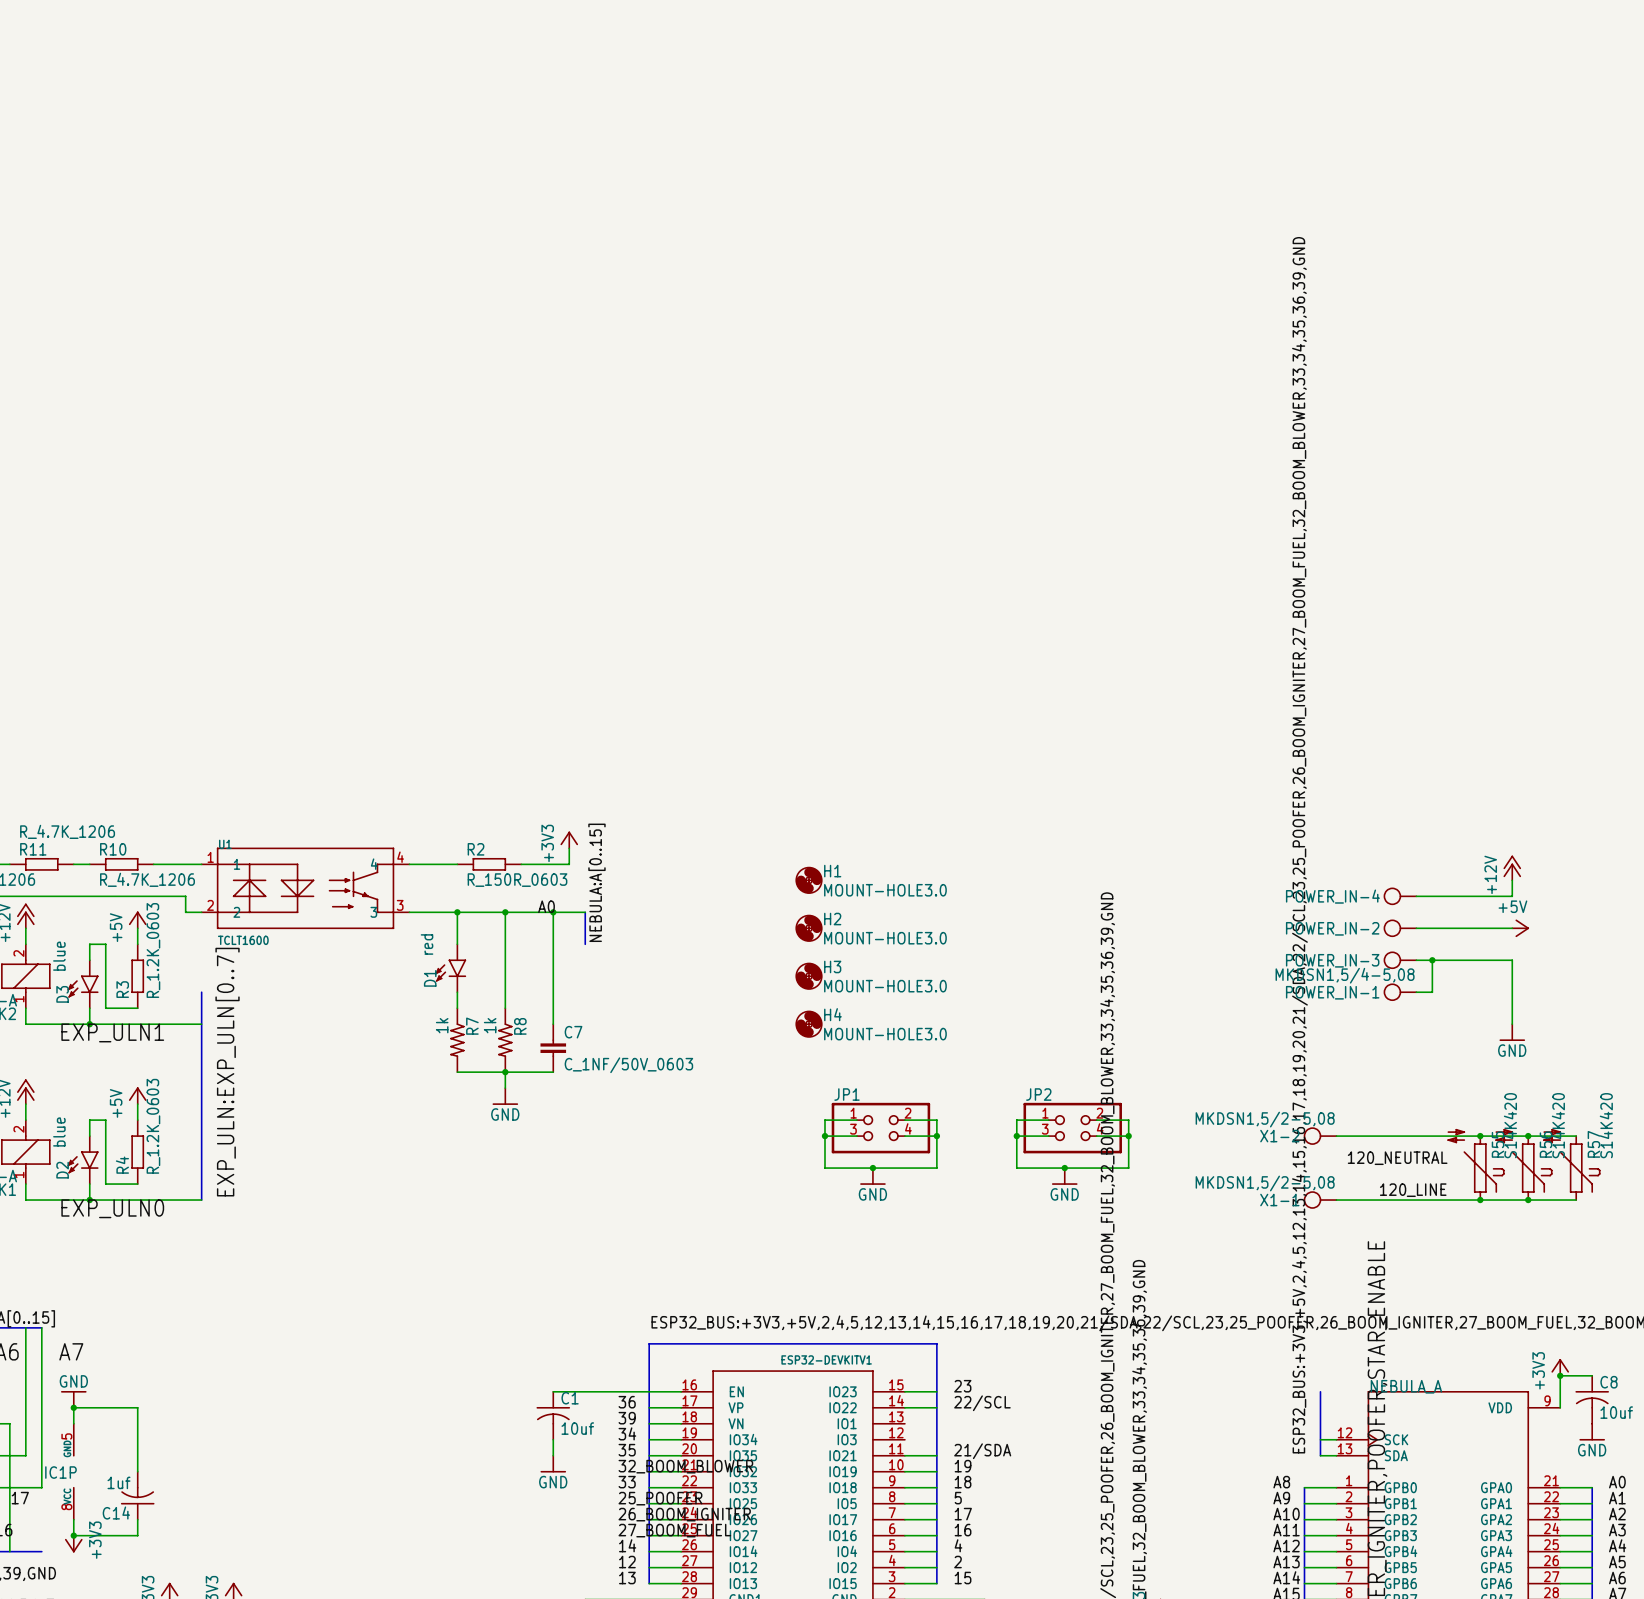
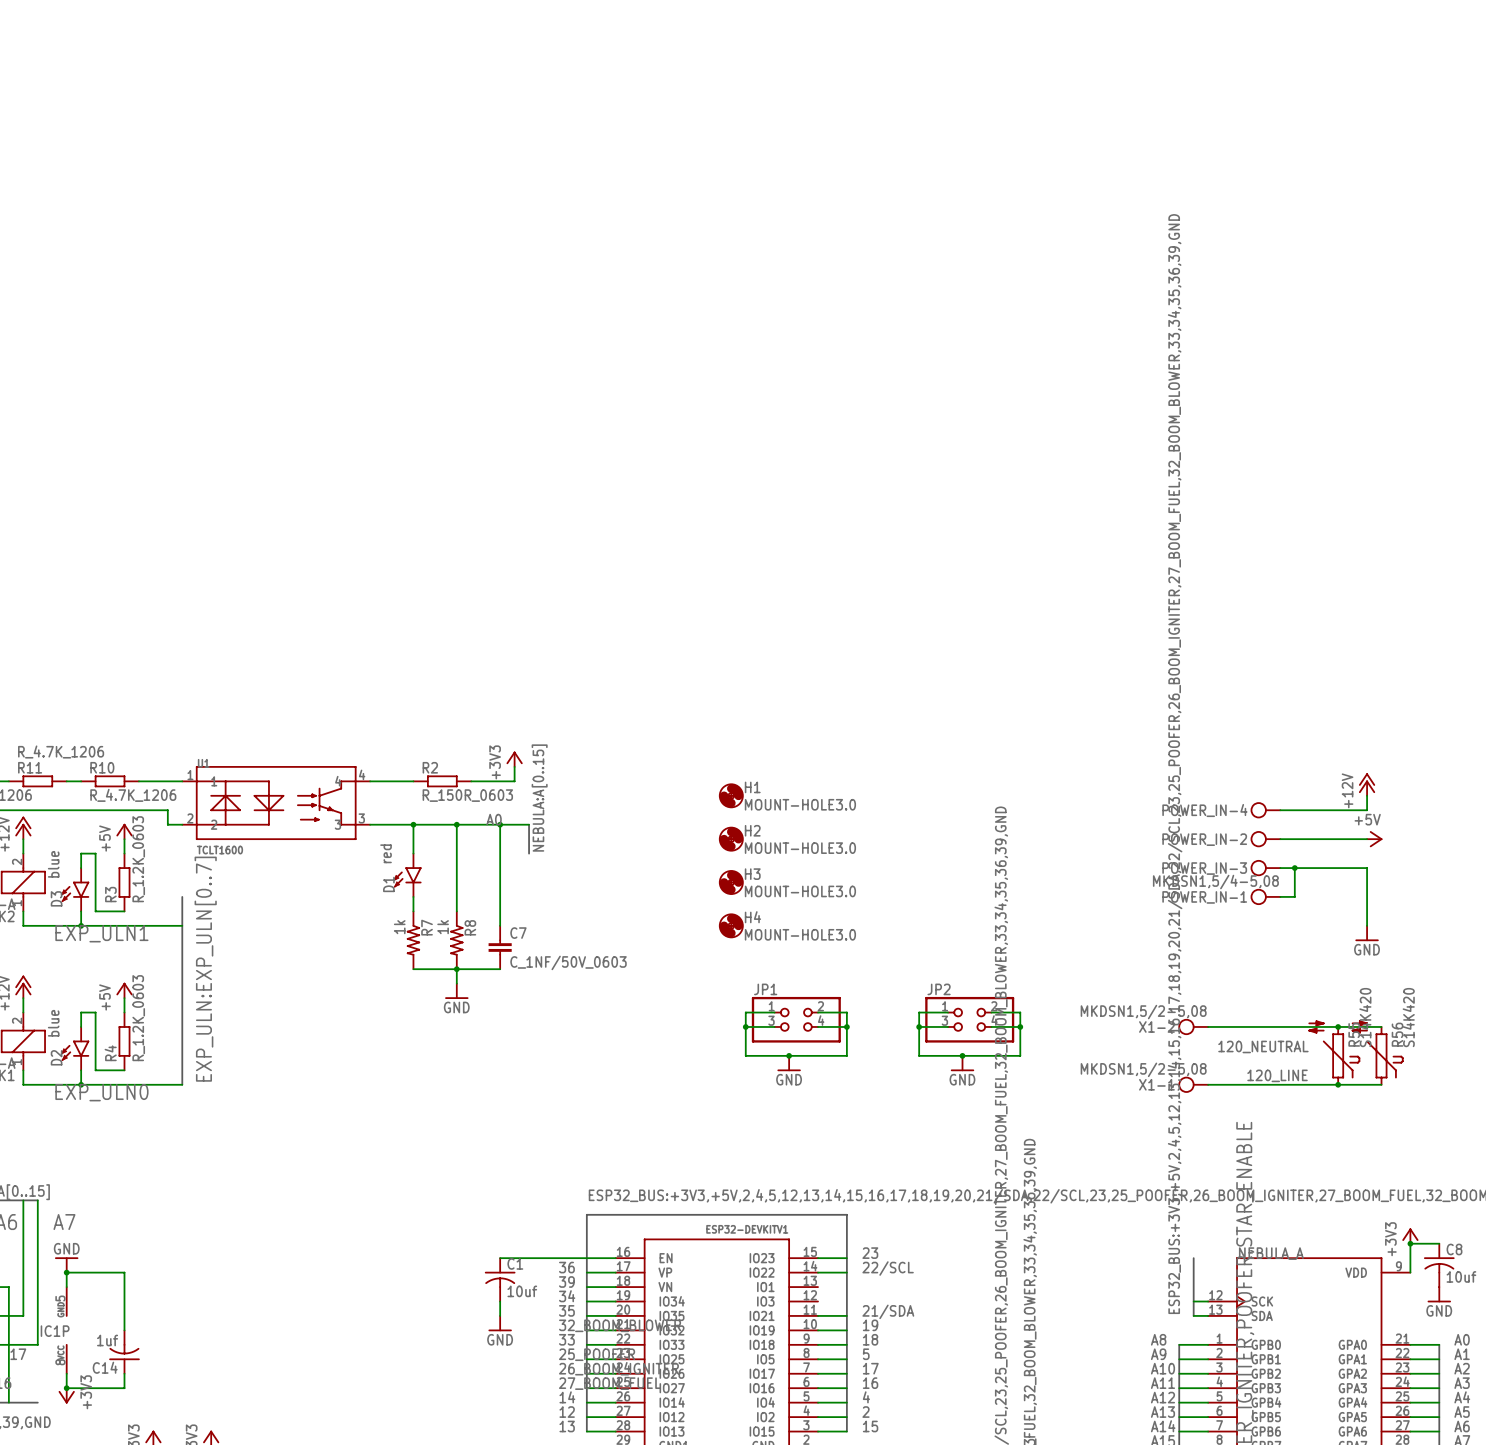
wire: (1528, 1136) (1576, 1136) -> none
junction: (1528, 1136) -> none
R57: S14K420 (1571, 1164) -> none
wire: (1528, 1200) (1576, 1200) -> none
junction: (1528, 1200) -> none

